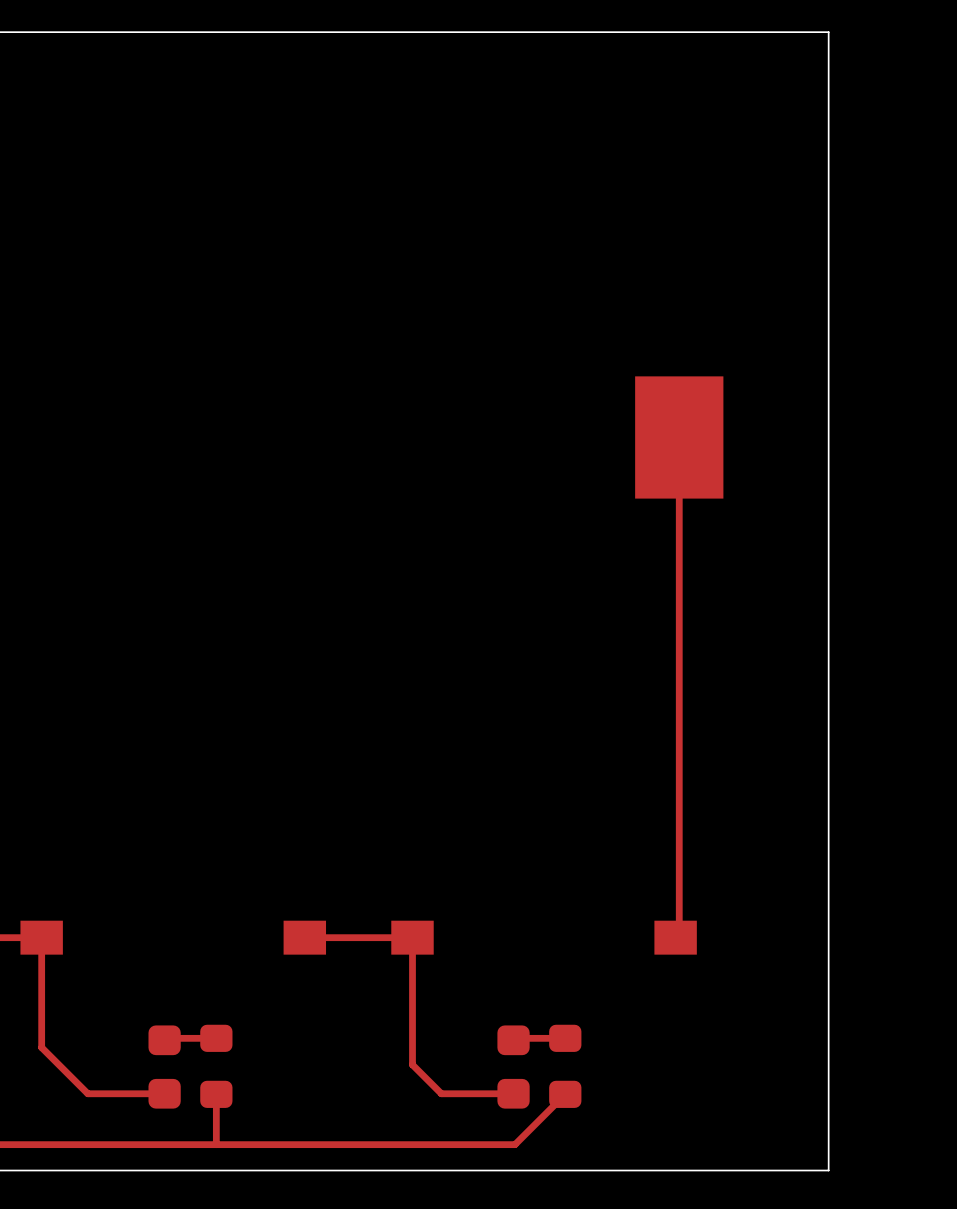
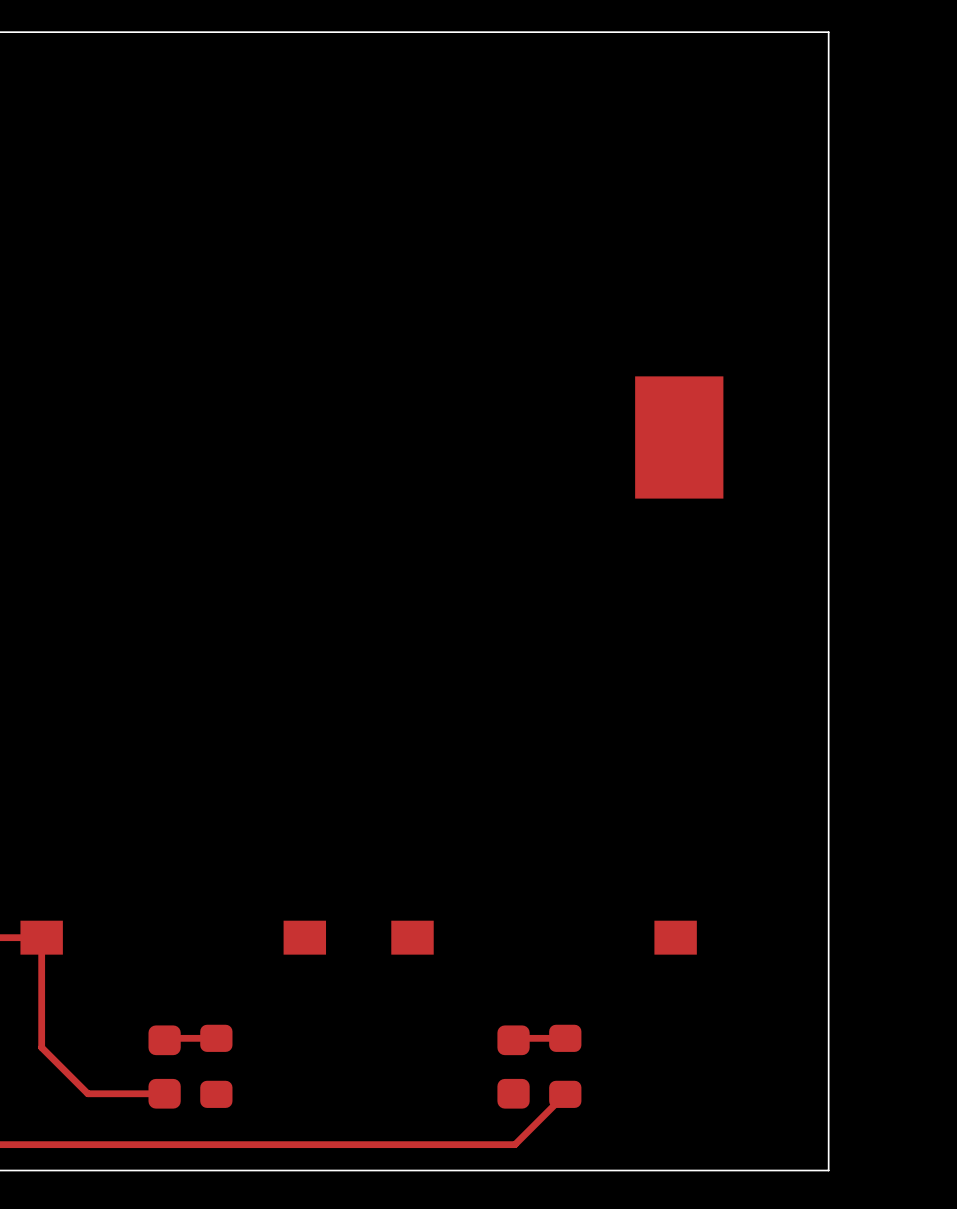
top track: (679, 437) (679, 934) (675, 937) -> none
top track: (304, 937) (412, 937) (412, 1064) (441, 1093) (513, 1093) -> none
top track: (216, 1094) (216, 1144) -> none

